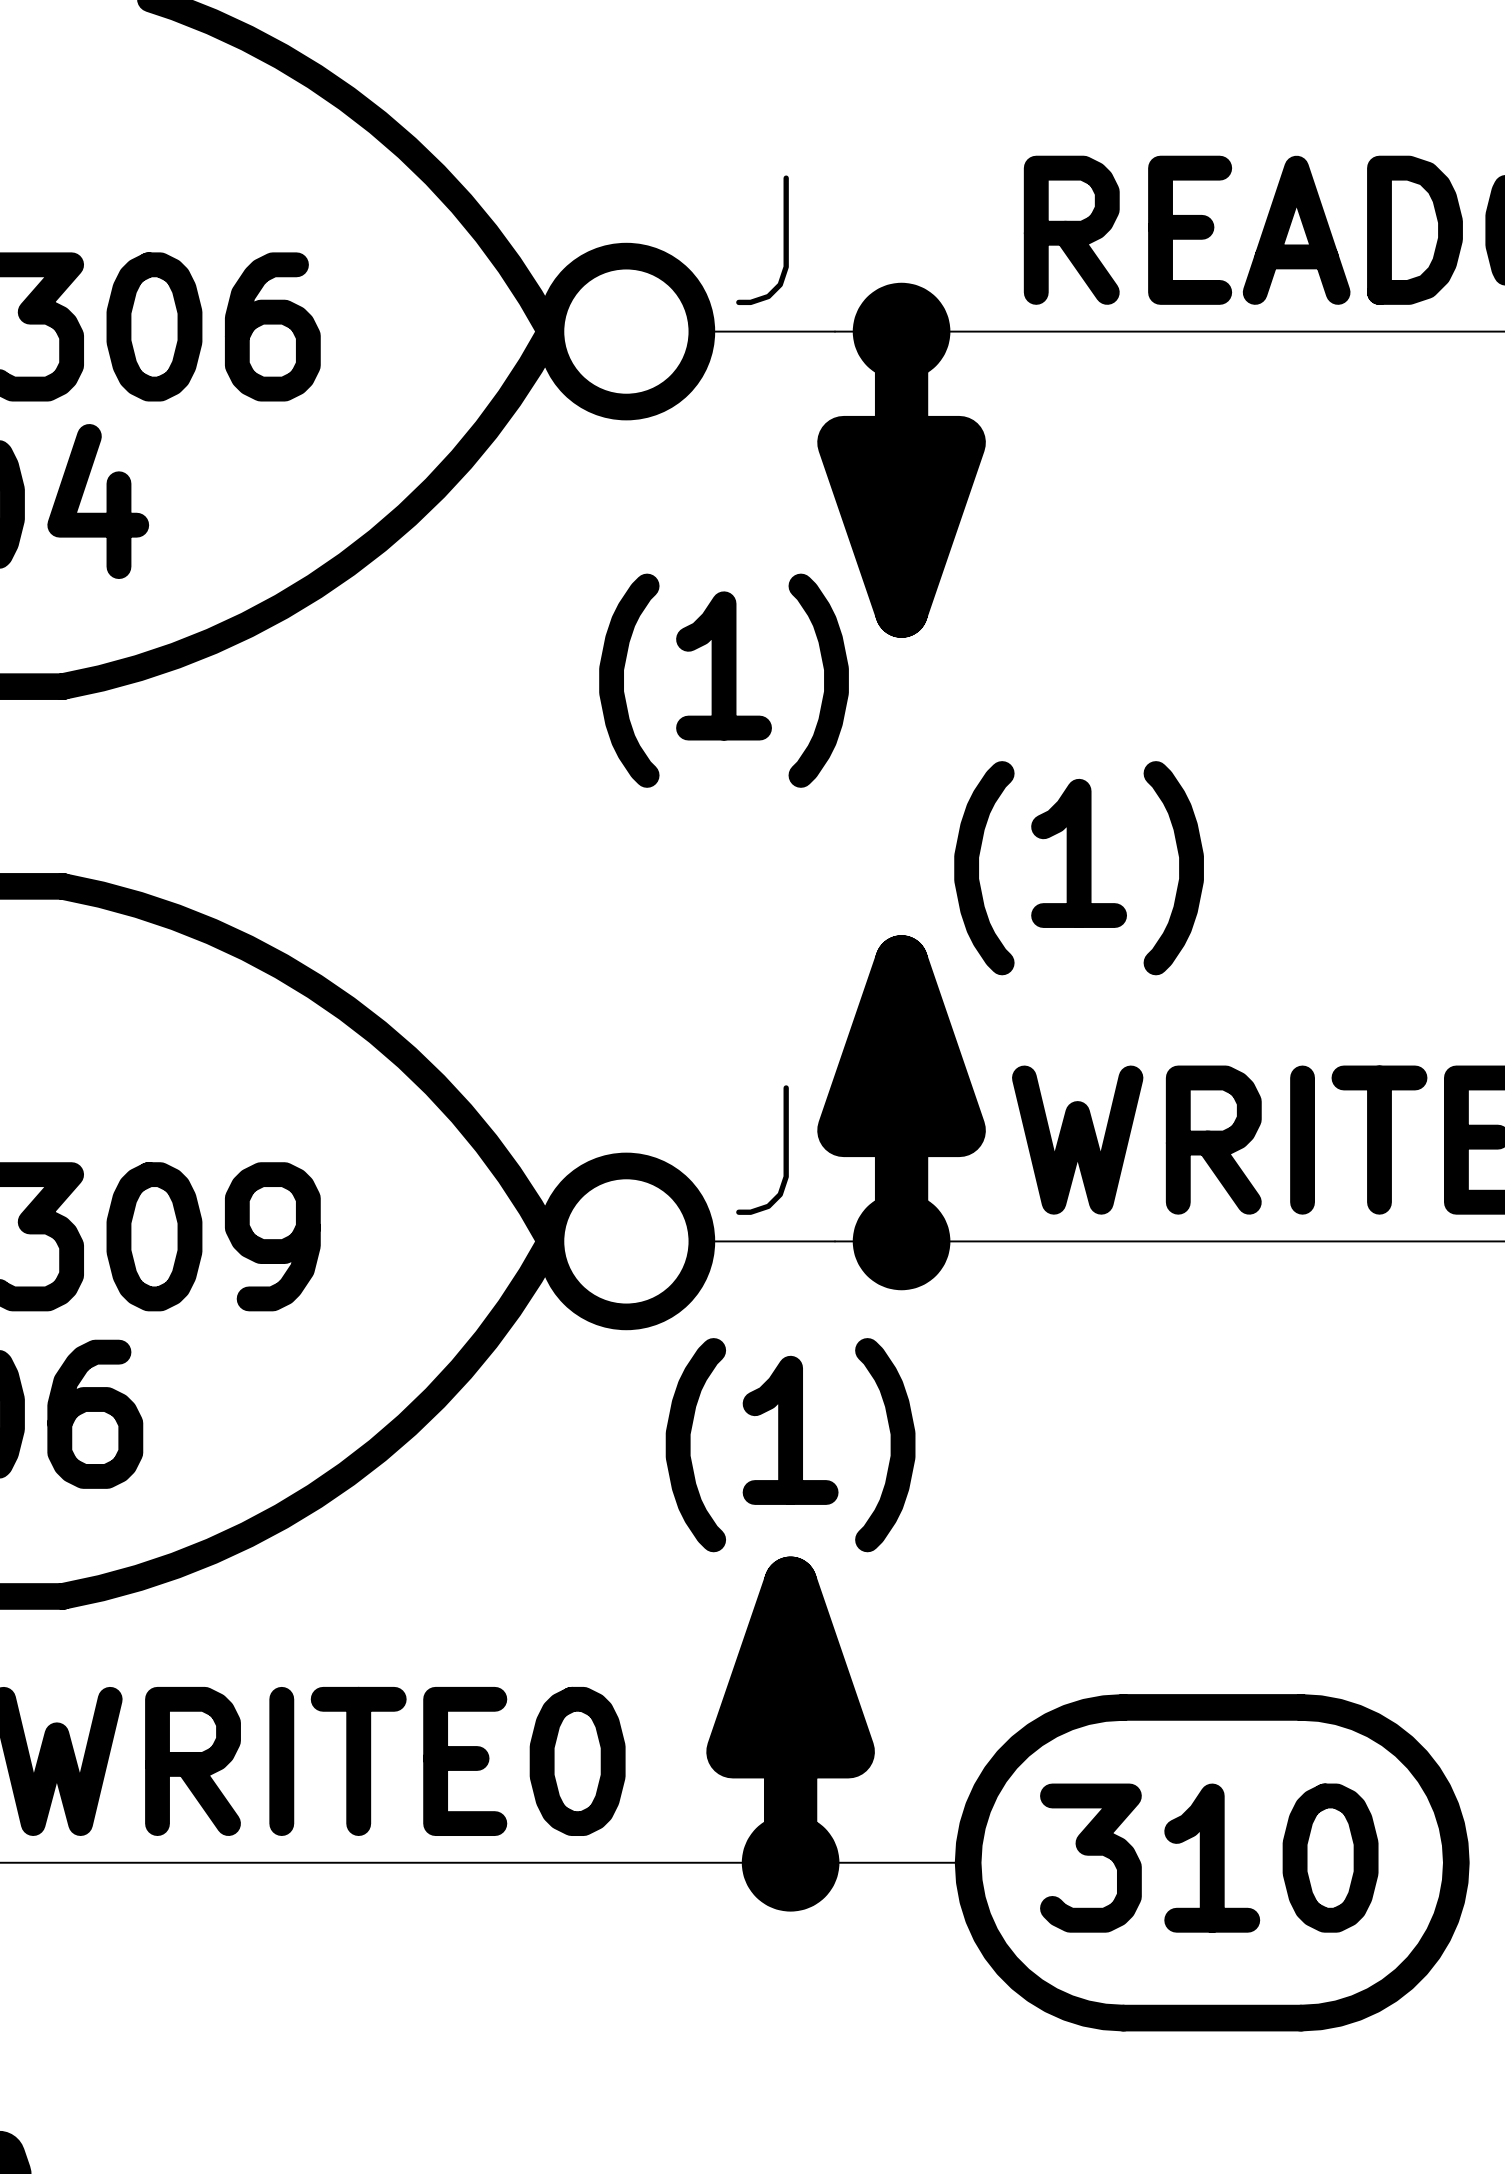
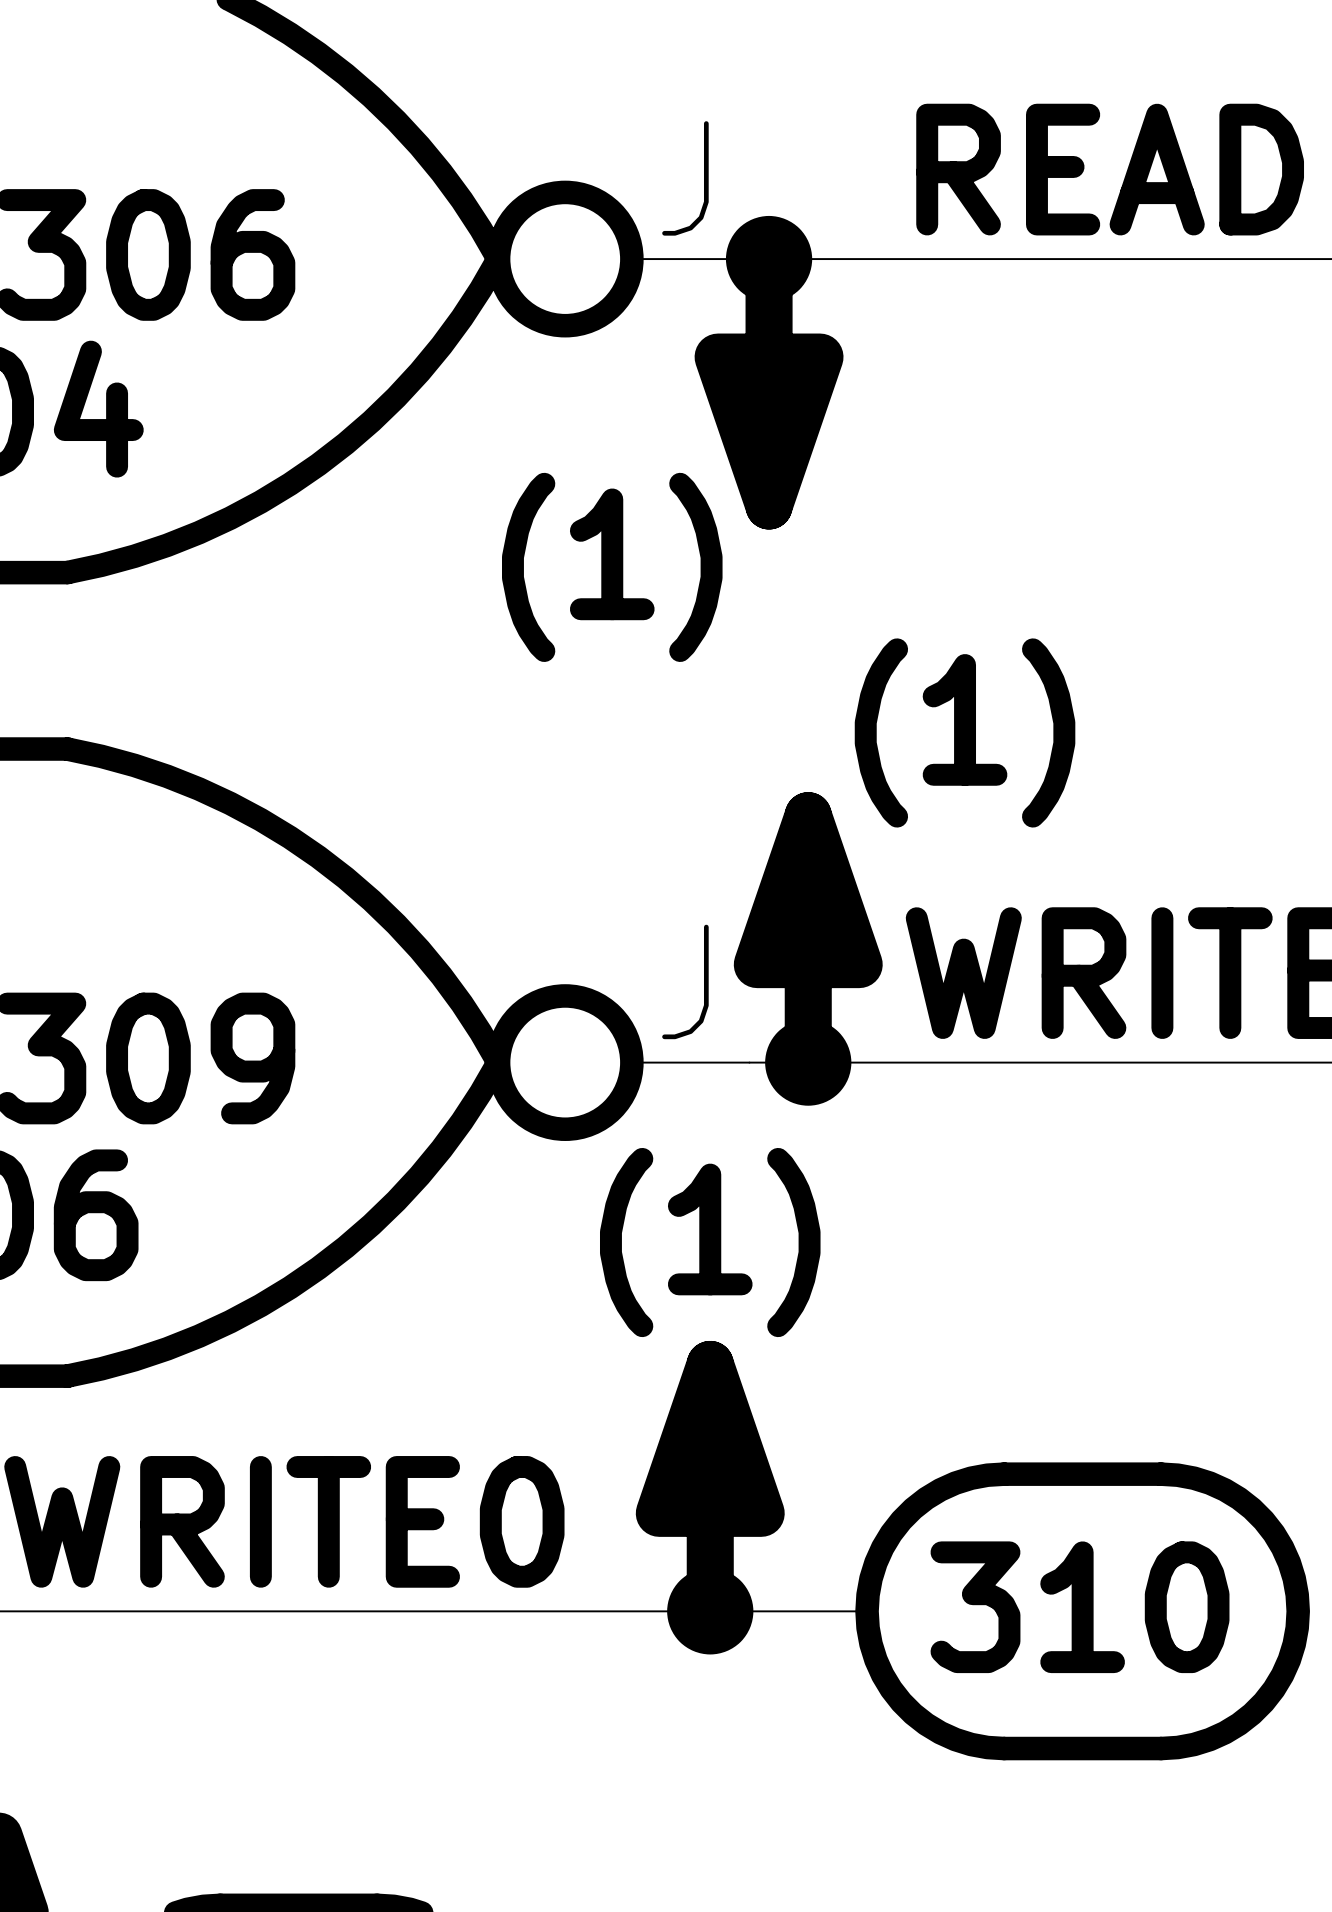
part position: (901, 460) -> (769, 372)

